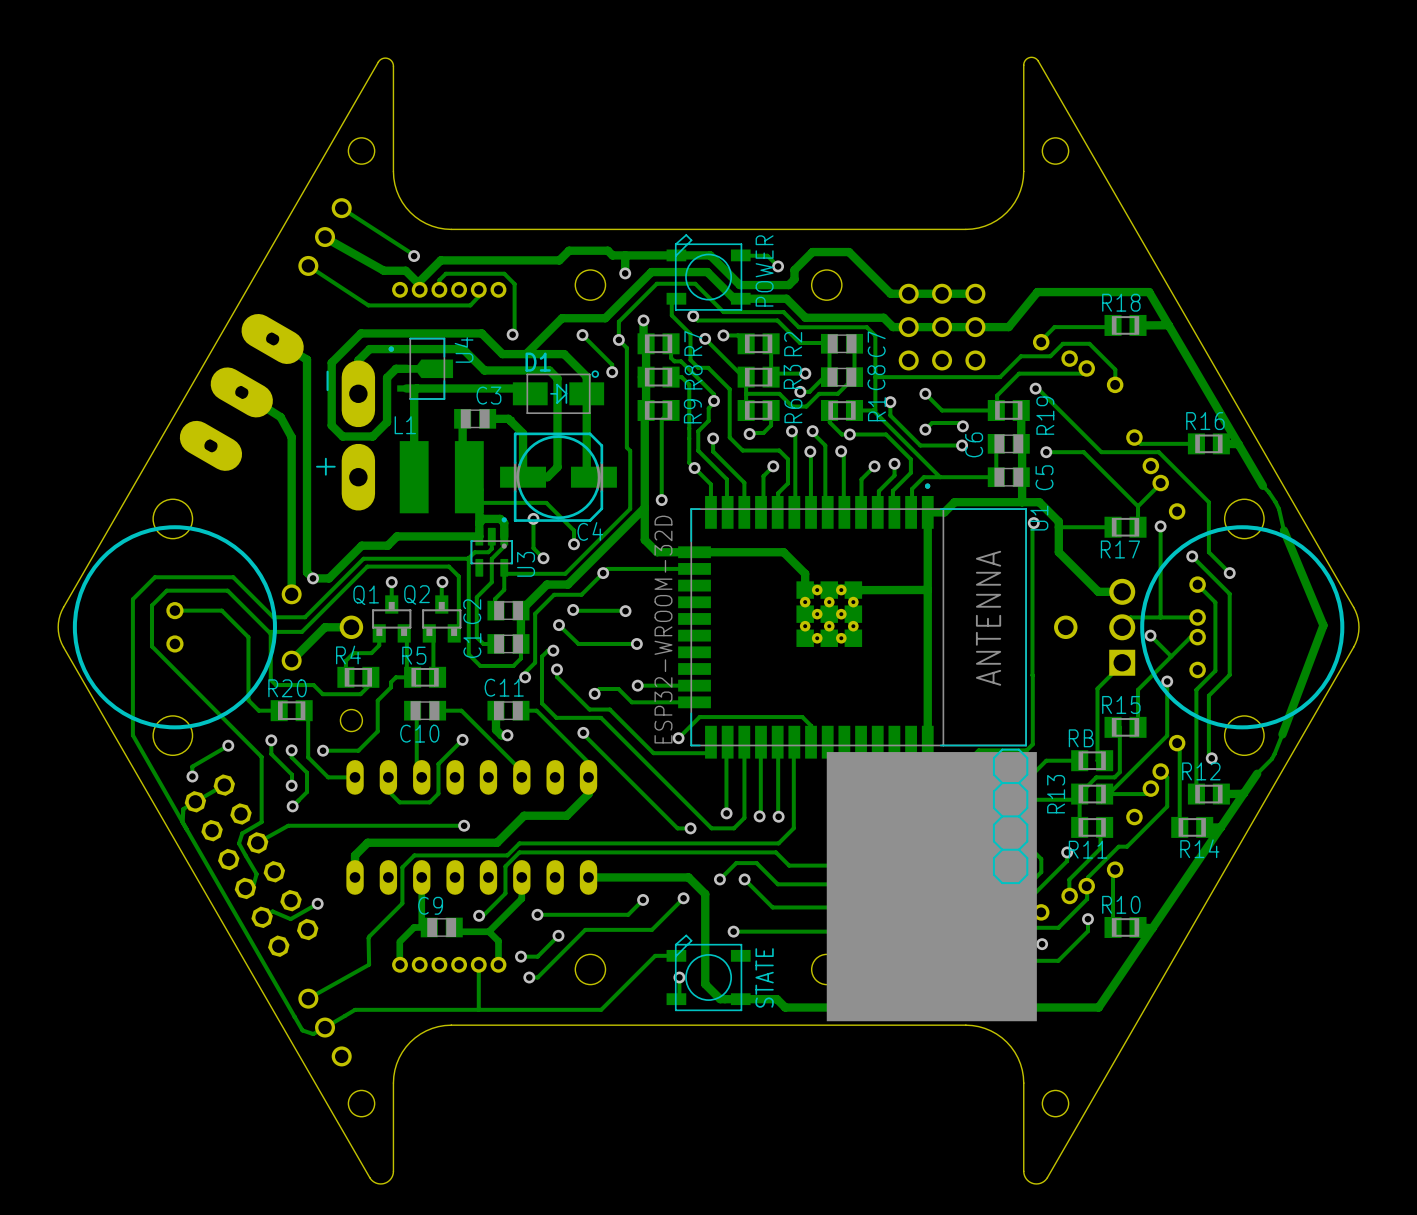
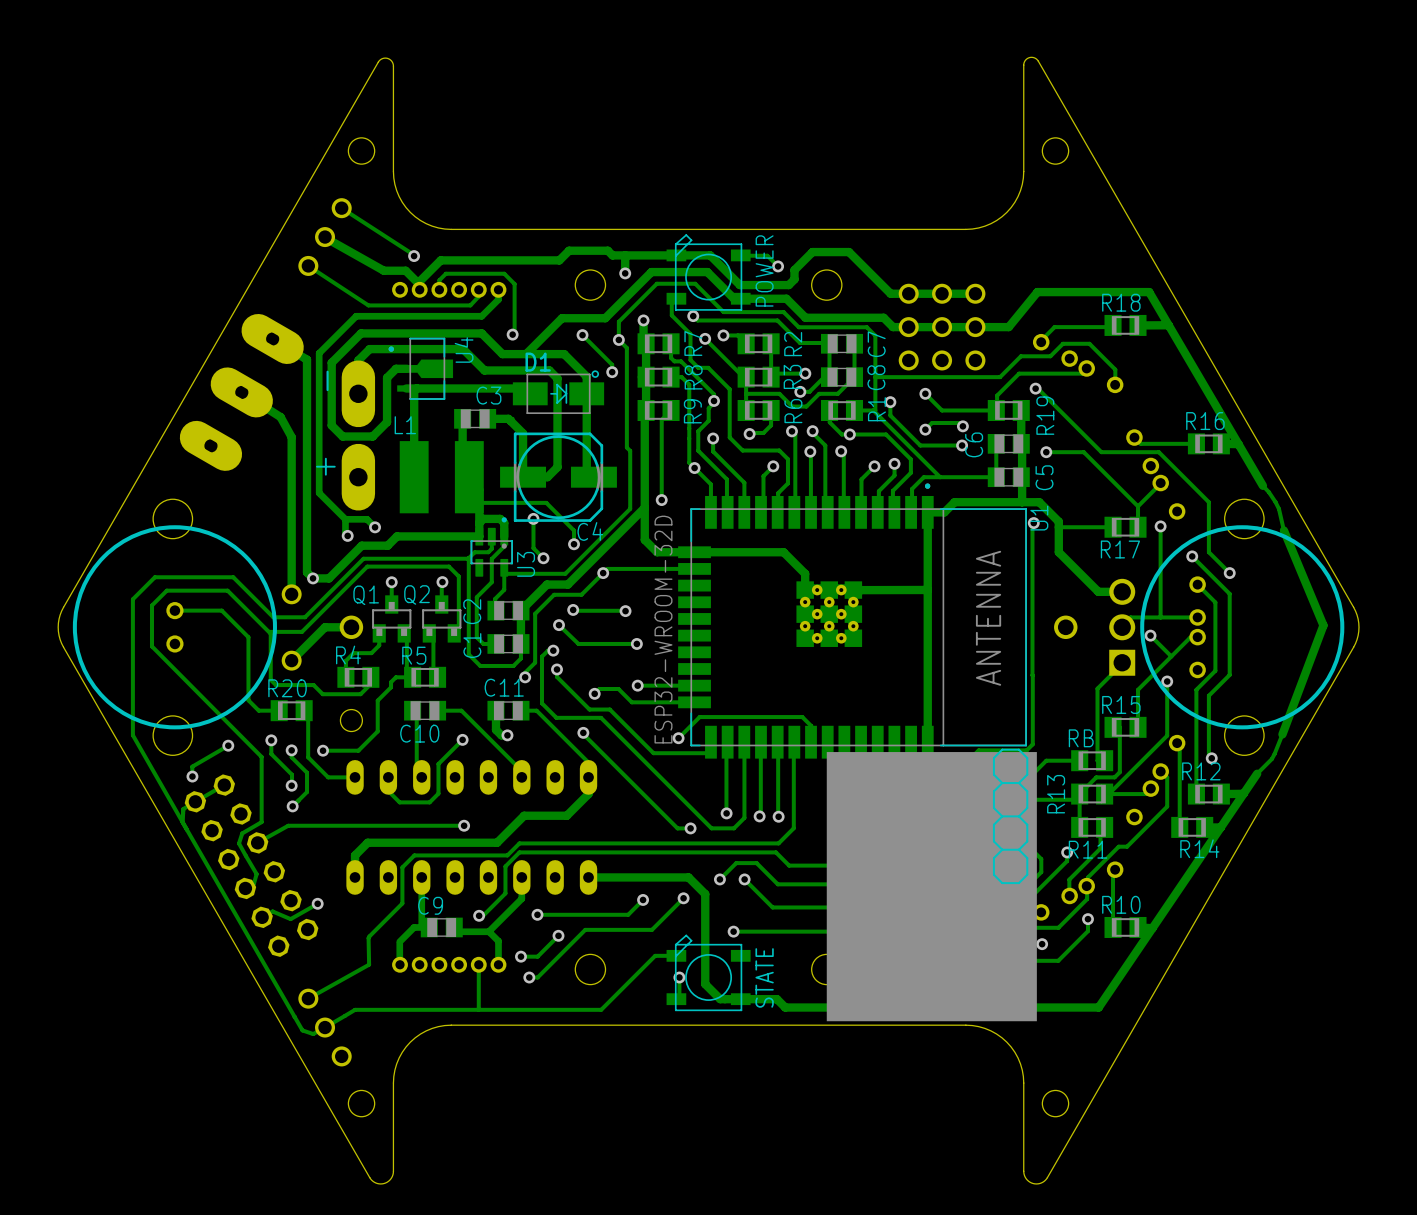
track: none -> (498, 289) (498, 299) (481, 316) (356, 316) (319, 353) (319, 493) (345, 519)
track: none -> (345, 519) (367, 519) (375, 527)
track: none -> (345, 519) (345, 533) (347, 535)
via: none -> (375, 527)
via: none -> (347, 535)

